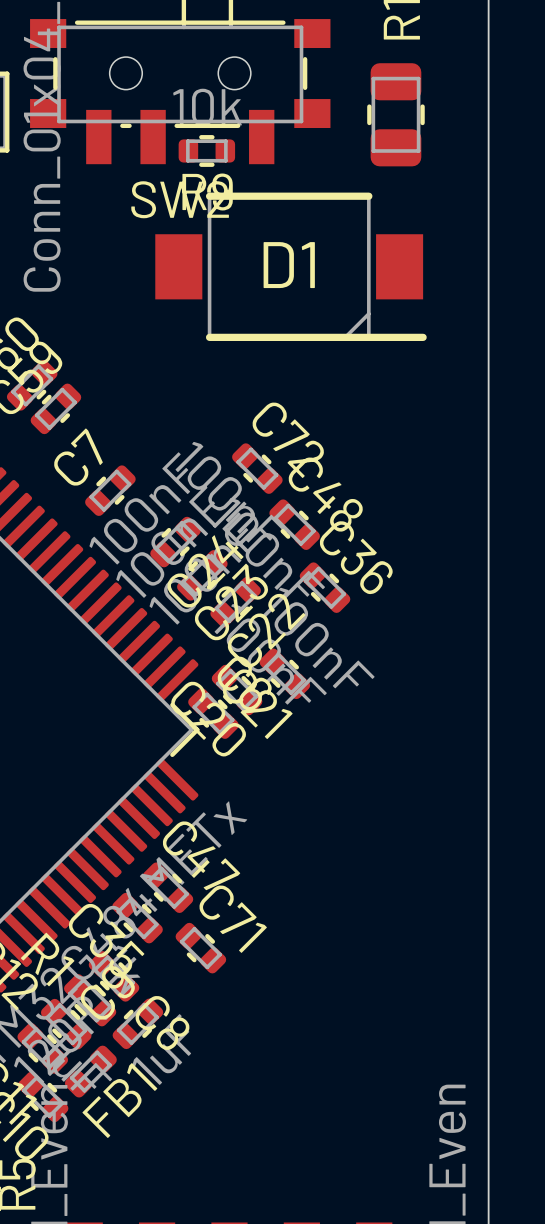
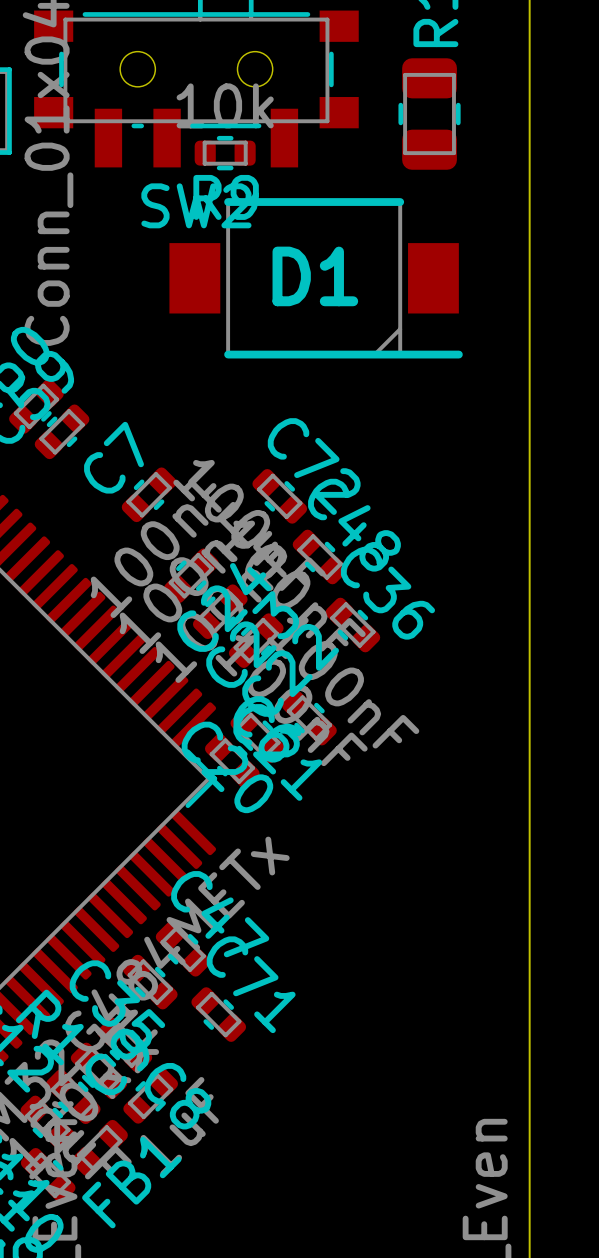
C7 position: (110, 490) -> (149, 494)

